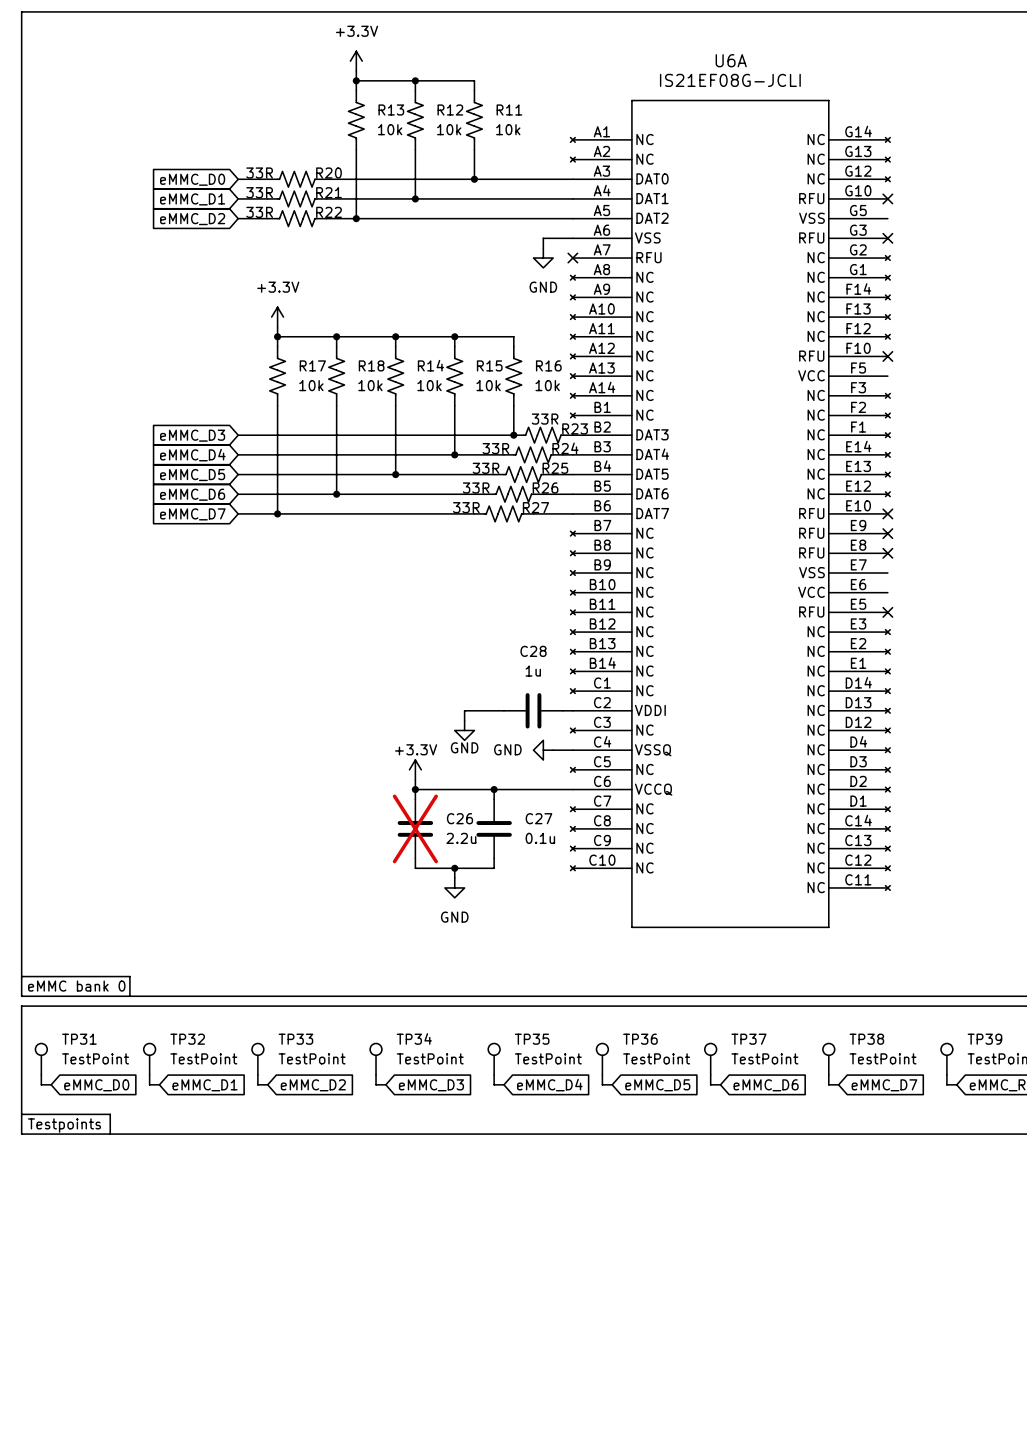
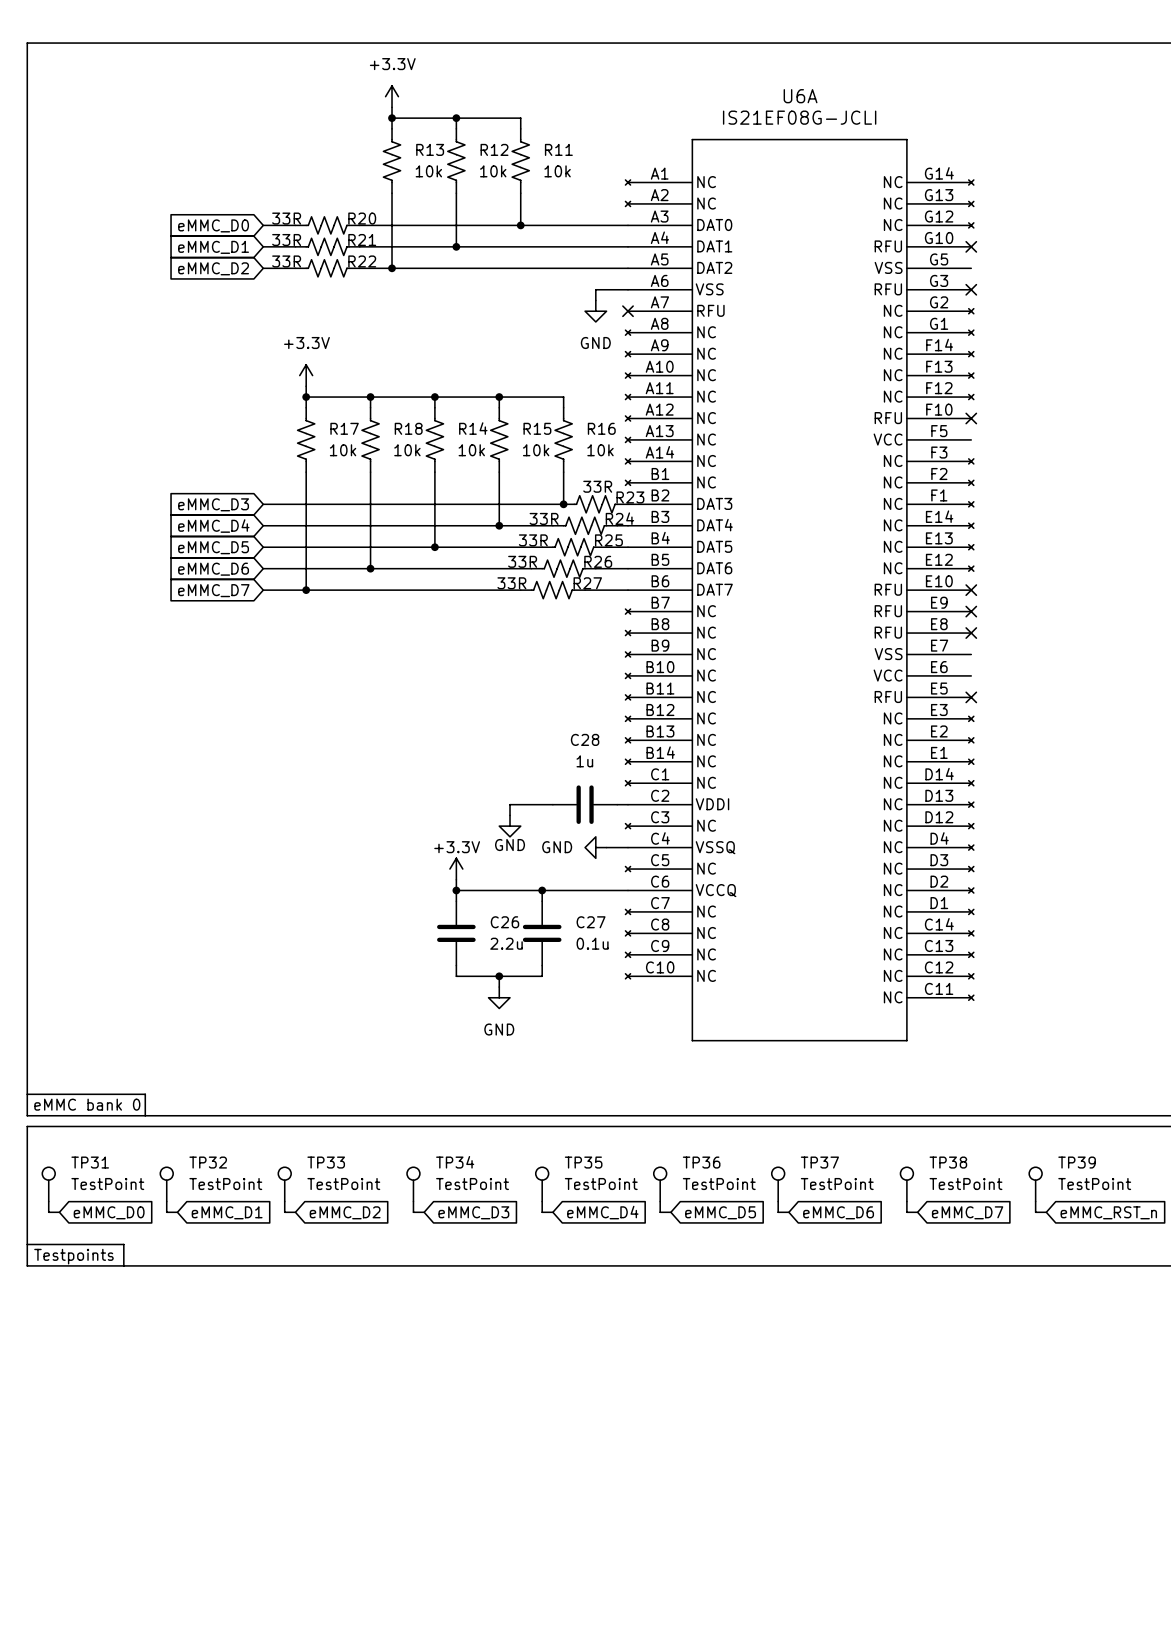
C26 do-not-place cross: (415, 828) -> none

